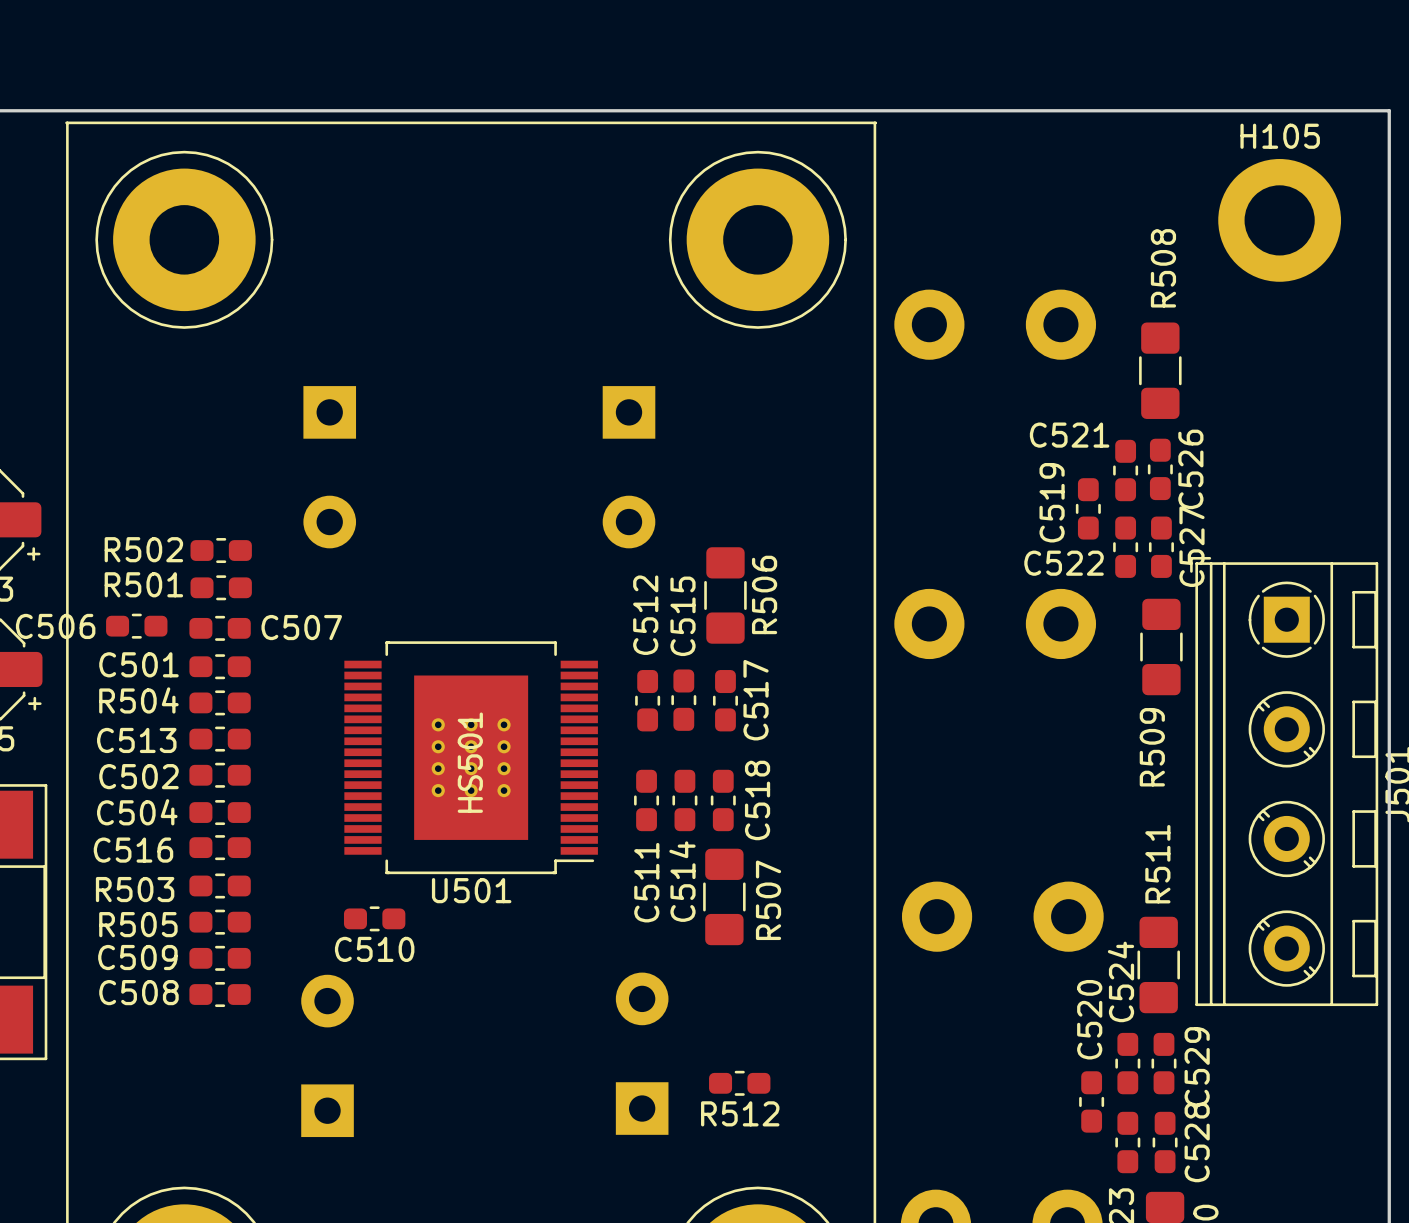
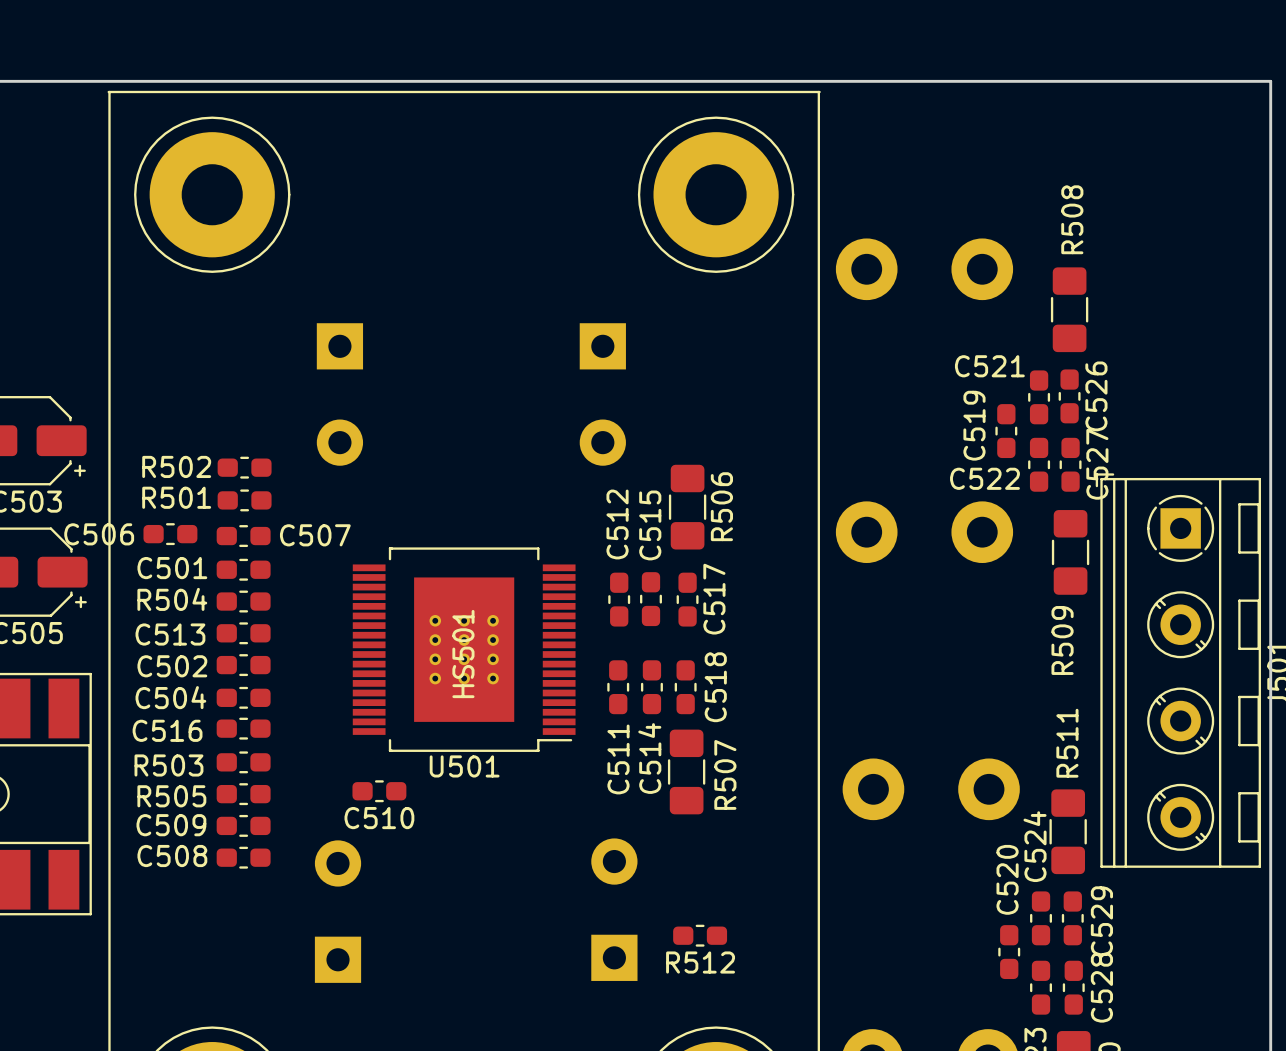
H105: (1279, 220) -> none

